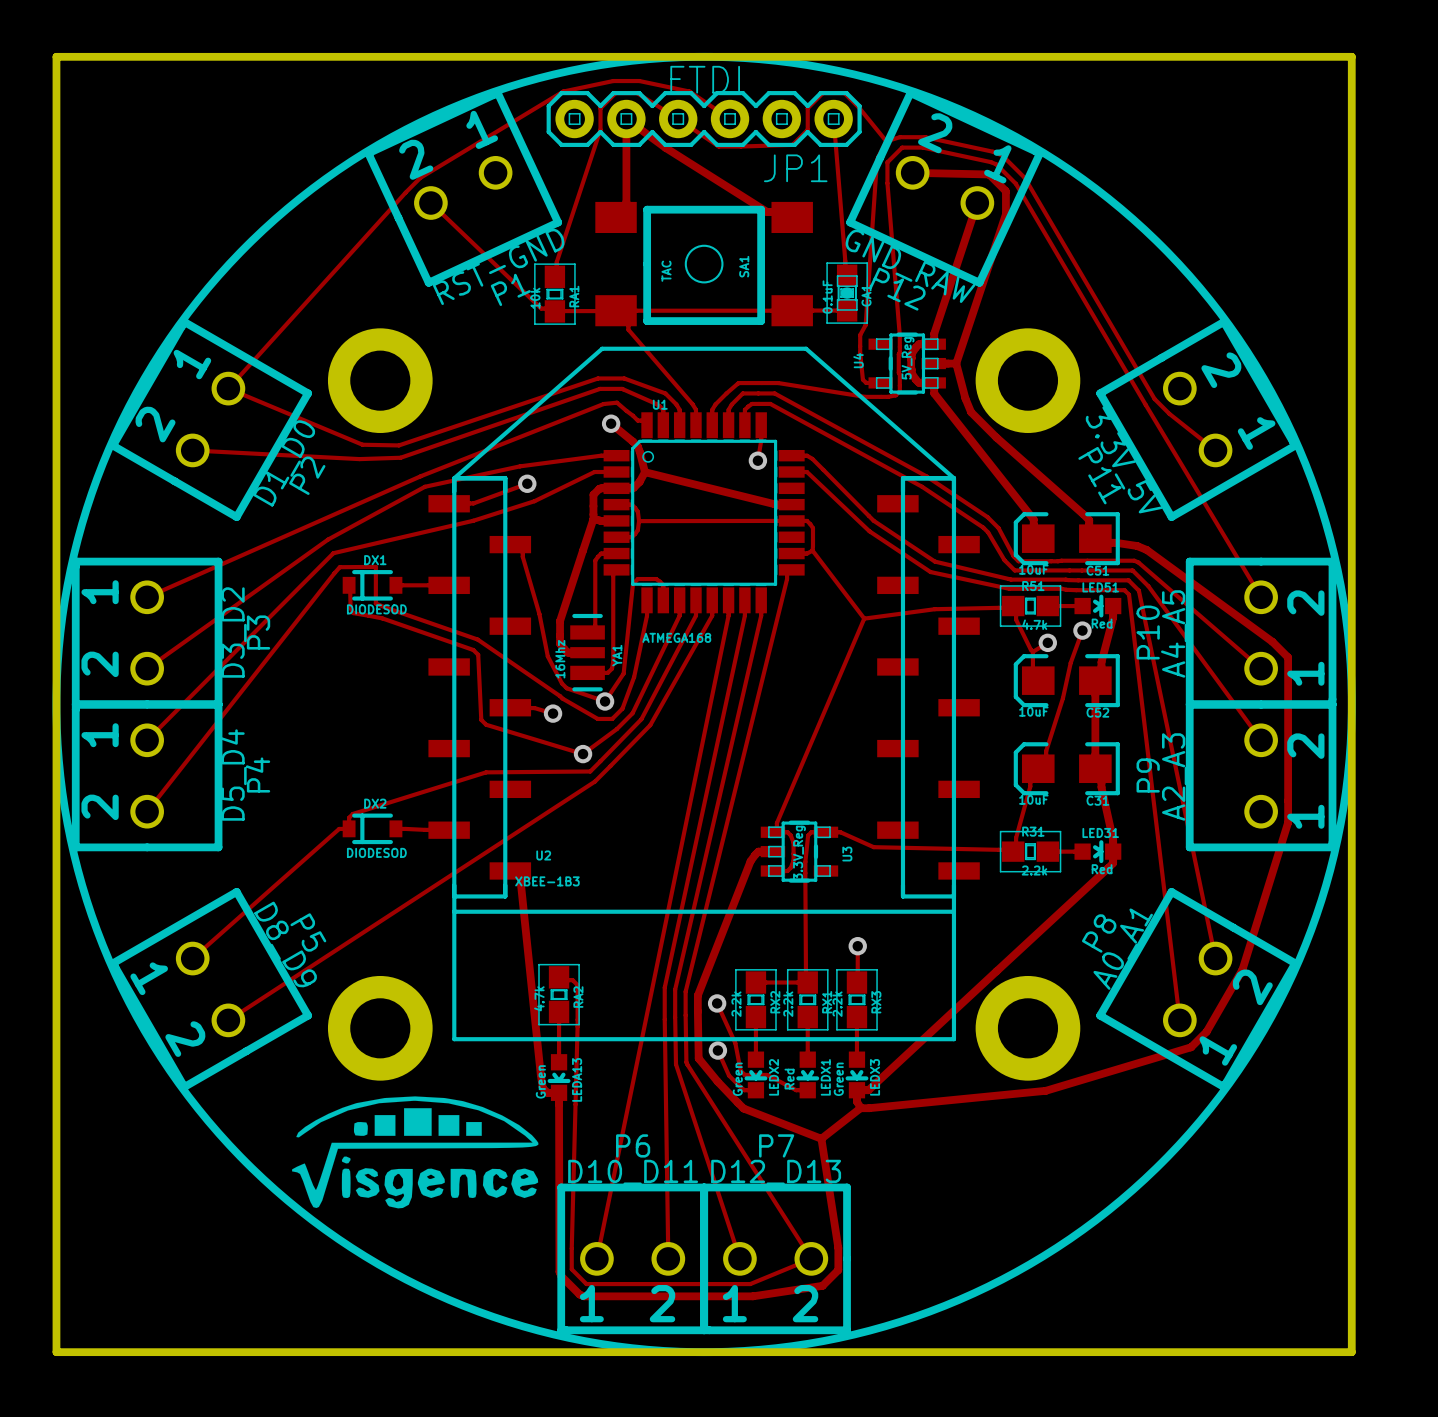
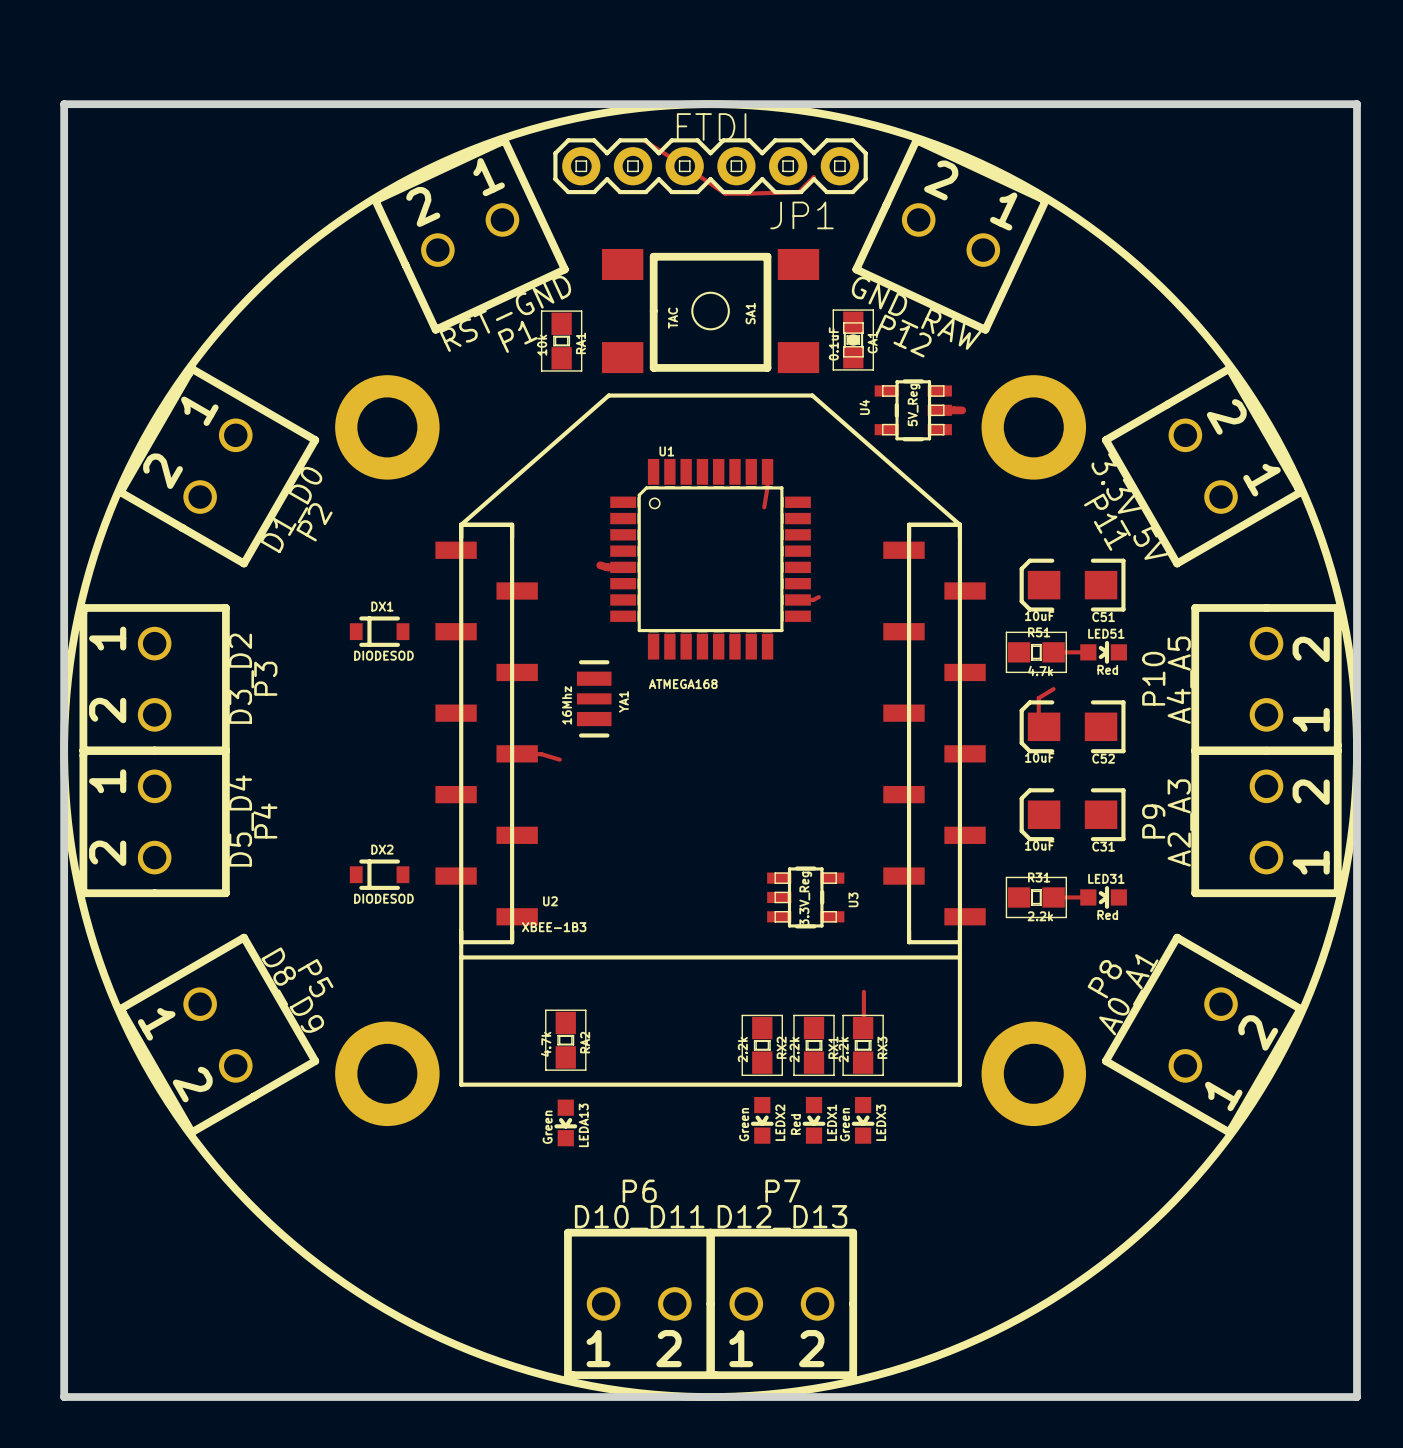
track: (615, 93) (600, 108) (600, 129) (556, 262) (554, 276) -> none
track: (822, 93) (807, 108) (807, 129) -> none
track: (844, 93) (886, 141) -> none
track: (730, 119) (689, 91) (639, 81) (613, 81) (562, 91) (420, 177) (228, 388) (362, 444) (398, 445) (597, 378) (624, 378) (665, 393) (679, 409) (679, 425) -> none
track: (833, 119) (847, 275) -> none
track: (886, 141) (877, 160) (865, 325) (860, 335) (862, 379) (866, 382) (880, 382) -> none
track: (886, 141) (900, 137) (925, 137) (993, 151) (1002, 155) (1024, 177) (1154, 399) (1169, 413) (1215, 450) -> none
track: (912, 172) (988, 174) (1005, 191) (1005, 214) (956, 363) (971, 412) (996, 437) (1089, 520) (1089, 528) (1095, 538) (1107, 542) (1137, 545) (1146, 549) (1272, 641) (1287, 657) (1288, 822) (1242, 969) (1206, 1031) (1191, 1047) (1045, 1090) (861, 1108) -> none
track: (430, 202) (541, 308) (554, 311) (616, 310) -> none
track: (977, 202) (934, 333) (933, 344) (919, 344) (915, 347) (911, 353) (911, 373) (919, 382) (933, 382) (934, 393) (1033, 519) (1033, 528) (1038, 538) -> none
track: (616, 217) (626, 205) (626, 119) (665, 147) (767, 212) (775, 212) (792, 217) -> none
track: (616, 310) (628, 324) (628, 329) (692, 404) (695, 409) (695, 425) -> none
track: (847, 310) (616, 310) -> none
track: (611, 423) (637, 446) (644, 472) -> none
via: (611, 423) -> none
track: (647, 425) (643, 420) (637, 420) (616, 402) (603, 404) (420, 476) (147, 597) -> none
track: (663, 425) (663, 409) (656, 403) (622, 388) (600, 388) (400, 457) (359, 459) (192, 450) -> none
track: (712, 425) (712, 409) (715, 404) (739, 383) (778, 383) (865, 396) (895, 395) (899, 391) (899, 335) (887, 162) (902, 147) (923, 147) (991, 162) (996, 164) (1015, 183) (1261, 597) -> none
track: (728, 425) (728, 409) (742, 393) (774, 393) (926, 476) (987, 517) (998, 528) (1013, 556) (1018, 561) (1134, 560) (1138, 562) (1261, 668) -> none
track: (744, 425) (744, 409) (748, 406) (752, 403) (770, 403) (922, 486) (983, 527) (1004, 560) (1014, 570) (1132, 570) (1148, 586) (1261, 740) -> none
track: (616, 455) (601, 455) (520, 466) (424, 486) (328, 539) (147, 668) -> none
track: (791, 455) (807, 455) (812, 458) (873, 520) (934, 561) (1011, 579) (1128, 580) (1138, 590) (1215, 958) -> none
via: (757, 460) -> none
track: (616, 472) (594, 472) (534, 501) (473, 520) (333, 553) (147, 740) -> none
track: (644, 472) (633, 487) (601, 488) (593, 494) (593, 518) (560, 621) (560, 643) (564, 649) (567, 652) (587, 652) -> none
track: (644, 472) (776, 504) (791, 504) -> none
track: (791, 472) (807, 472) (869, 531) (930, 572) (1009, 588) (1124, 590) (1129, 594) (1179, 1020) -> none
track: (527, 483) (473, 503) (449, 503) -> none
via: (527, 483) -> none
track: (616, 504) (631, 504) (637, 511) (639, 521) -> none
track: (639, 521) (637, 530) (631, 537) (616, 537) -> none
track: (639, 521) (807, 520) (812, 528) (812, 550) (864, 618) -> none
track: (510, 544) (522, 551) (539, 614) (547, 656) (561, 683) (566, 688) (605, 701) (623, 673) (632, 583) (637, 579) (656, 579) (663, 585) (663, 600) -> none
track: (616, 553) (601, 553) (595, 560) (595, 627) (587, 632) -> none
track: (616, 569) (613, 573) (612, 668) (607, 672) (587, 672) -> none
track: (791, 569) (787, 573) (685, 991) (686, 1062) (811, 1258) (750, 1284) (586, 1284) (571, 1269) (577, 985) (572, 980) (559, 977) -> none
track: (349, 585) (350, 608) (353, 613) (382, 618) (473, 649) (478, 654) (481, 719) (486, 724) (583, 754) (616, 729) (632, 713) (679, 615) (679, 600) -> none
track: (395, 585) (449, 585) -> none
track: (647, 600) (647, 615) (634, 677) (622, 708) (612, 718) (597, 718) (562, 698) (477, 639) (375, 603) (375, 566) (339, 567) (147, 811) -> none
track: (695, 600) (695, 615) (641, 719) (590, 771) (486, 772) (352, 813) (349, 817) (349, 828) (339, 828) (192, 958) -> none
track: (712, 600) (712, 615) (650, 725) (594, 781) (228, 1020) -> none
track: (728, 600) (728, 615) (596, 1258) -> none
track: (744, 600) (744, 615) (664, 987) (668, 1258) -> none
track: (761, 600) (761, 615) (675, 989) (675, 1064) (739, 1258) -> none
track: (1113, 606) (1113, 617) (1101, 662) (1101, 670) (1095, 680) (1095, 768) (1101, 779) (1101, 787) (1113, 840) (1113, 863) (868, 1090) (856, 1090) (856, 1101) (860, 1107) (821, 1138) -> none
track: (864, 618) (776, 823) (776, 828) (772, 832) (787, 832) (790, 835) (793, 842) (793, 860) (787, 871) (772, 871) -> none
track: (864, 618) (934, 609) (1013, 606) (1016, 619) (1032, 651) -> none
track: (1082, 630) (1070, 662) (1046, 756) (1030, 780) (1013, 851) (1004, 849) (873, 847) (840, 832) (811, 832) (808, 835) (805, 861) (805, 973) (807, 982) (755, 982) -> none
via: (1082, 630) -> none
via: (1047, 642) -> none
via: (605, 701) -> none
via: (553, 713) -> none
via: (583, 754) -> none
track: (395, 828) (449, 830) -> none
track: (772, 851) (758, 851) (750, 861) (697, 995) (698, 1058) (743, 1108) (821, 1138) -> none
track: (510, 870) (520, 875) (542, 1088) (547, 1092) (559, 1092) (559, 1271) (561, 1276) (579, 1294) (583, 1296) (752, 1296) (822, 1285) (838, 1270) (838, 1247) (821, 1138) -> none
via: (857, 946) -> none
track: (717, 1003) (735, 1043) (740, 1070) (744, 1074) (767, 1074) (796, 1090) (807, 1090) -> none
via: (717, 1003) -> none
track: (559, 1011) (559, 1062) -> none
track: (755, 1017) (755, 1059) -> none
track: (807, 1017) (807, 1059) -> none
track: (856, 1017) (856, 1059) -> none
track: (717, 1050) (729, 1075) (744, 1090) (755, 1090) -> none
via: (717, 1050) -> none
drawing: [292, 1096, 539, 1209] -> none

